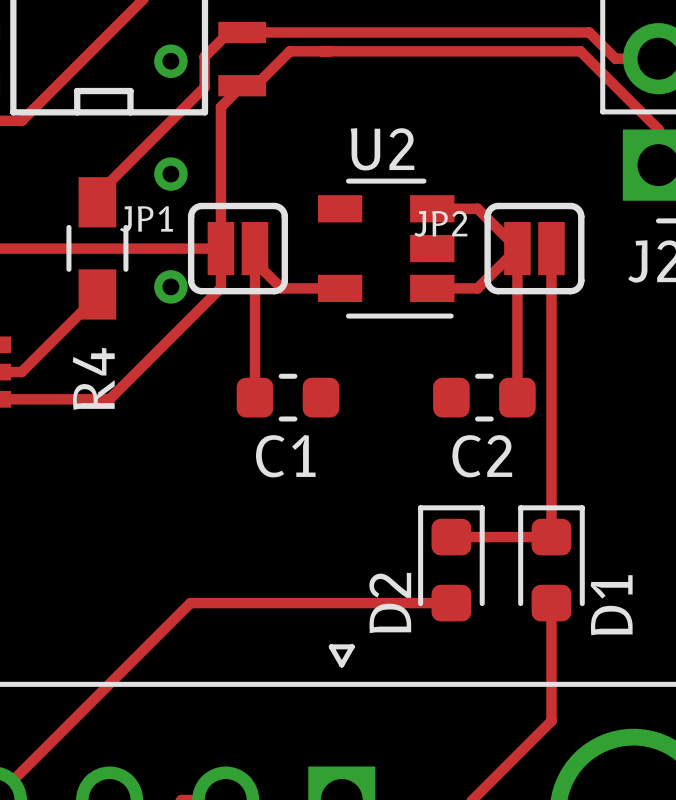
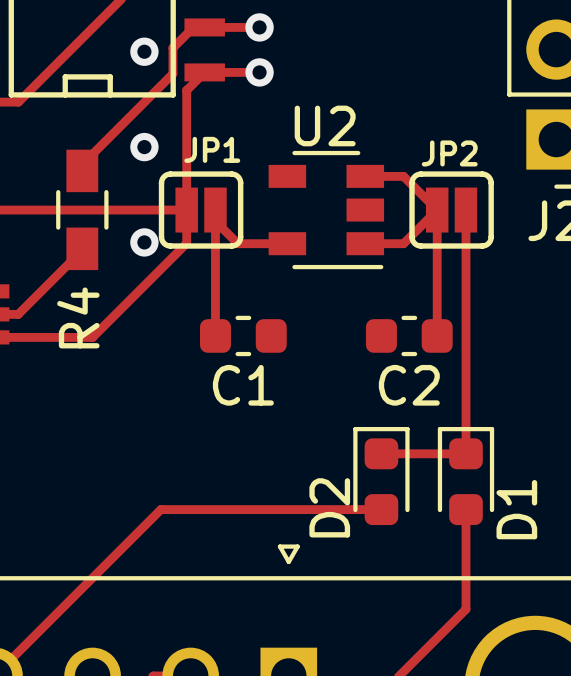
track: (307, 32) (589, 32) (615, 58) (658, 58) -> none
via: none -> (259, 27)
track: (255, 85) (289, 51) (580, 51) (658, 129) (658, 165) -> (215, 72) (259, 72)
via: none -> (259, 72)
JP1 name position: JP1 (146, 219) -> JP1 (212, 149)
JP2 name position: JP2 (440, 223) -> JP2 (449, 153)

